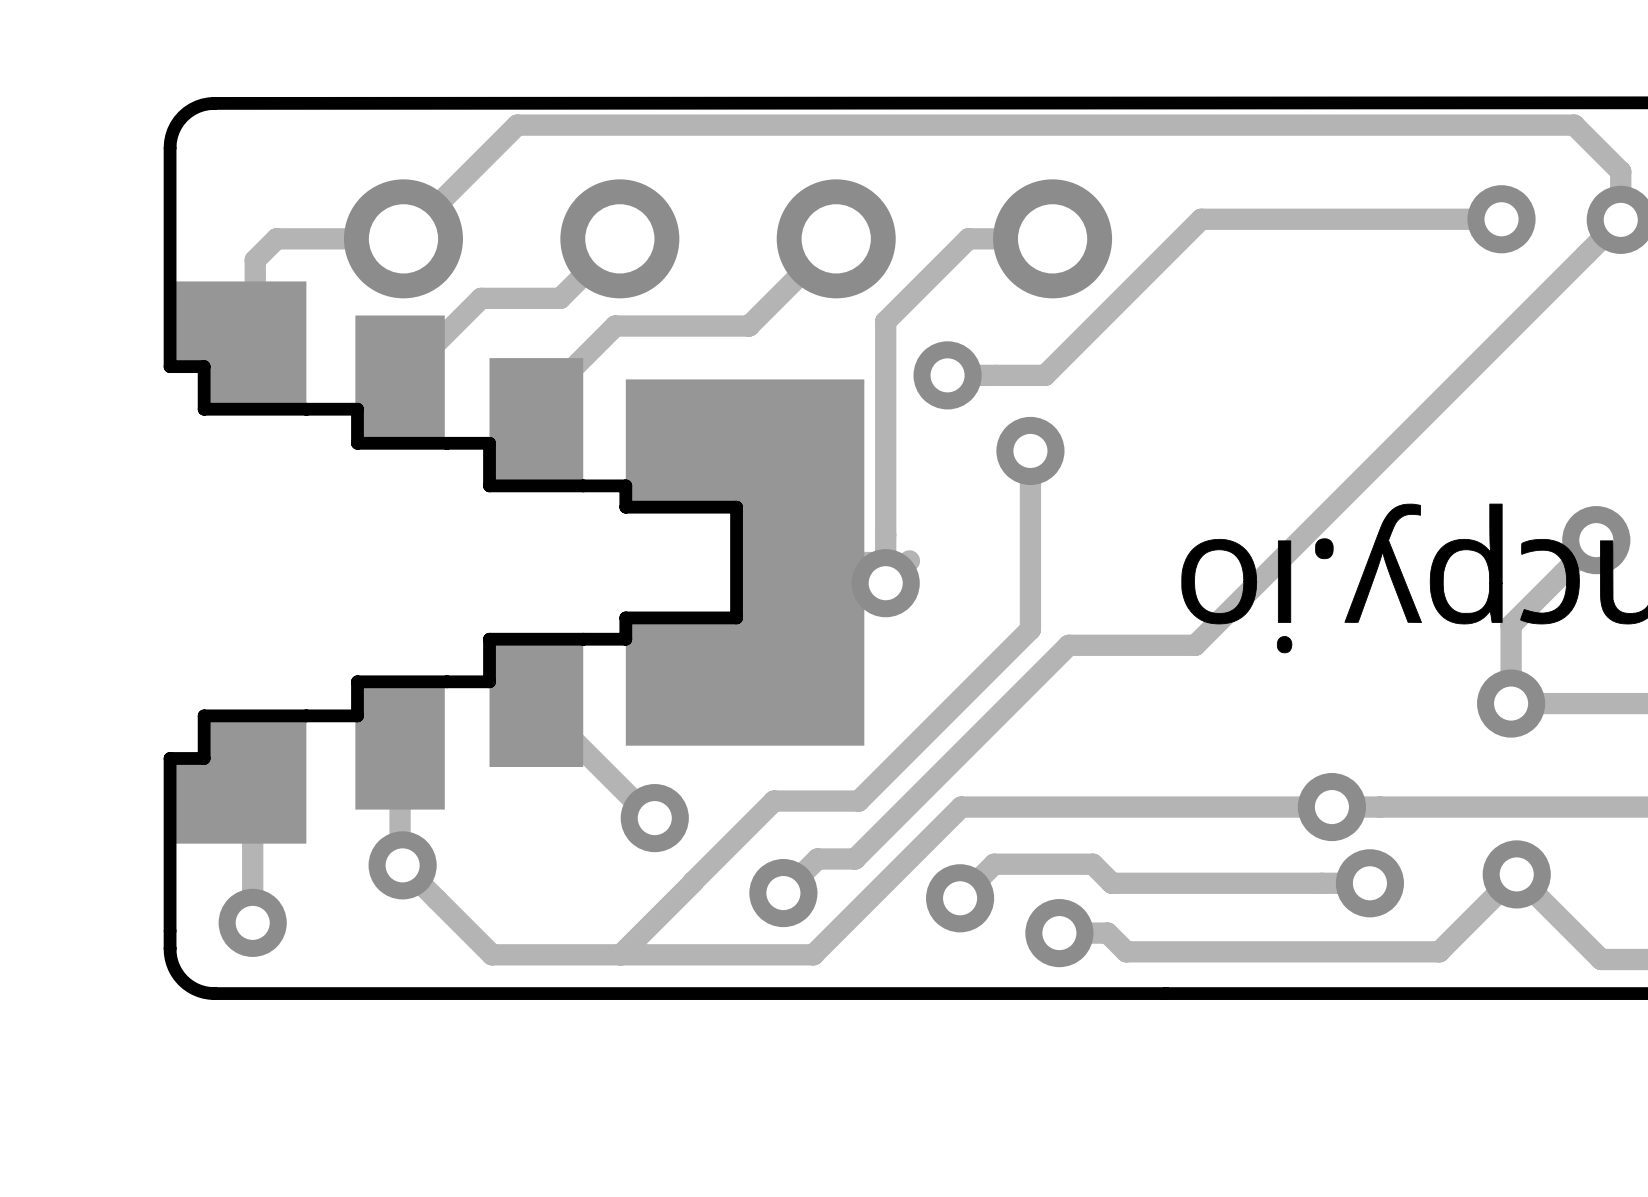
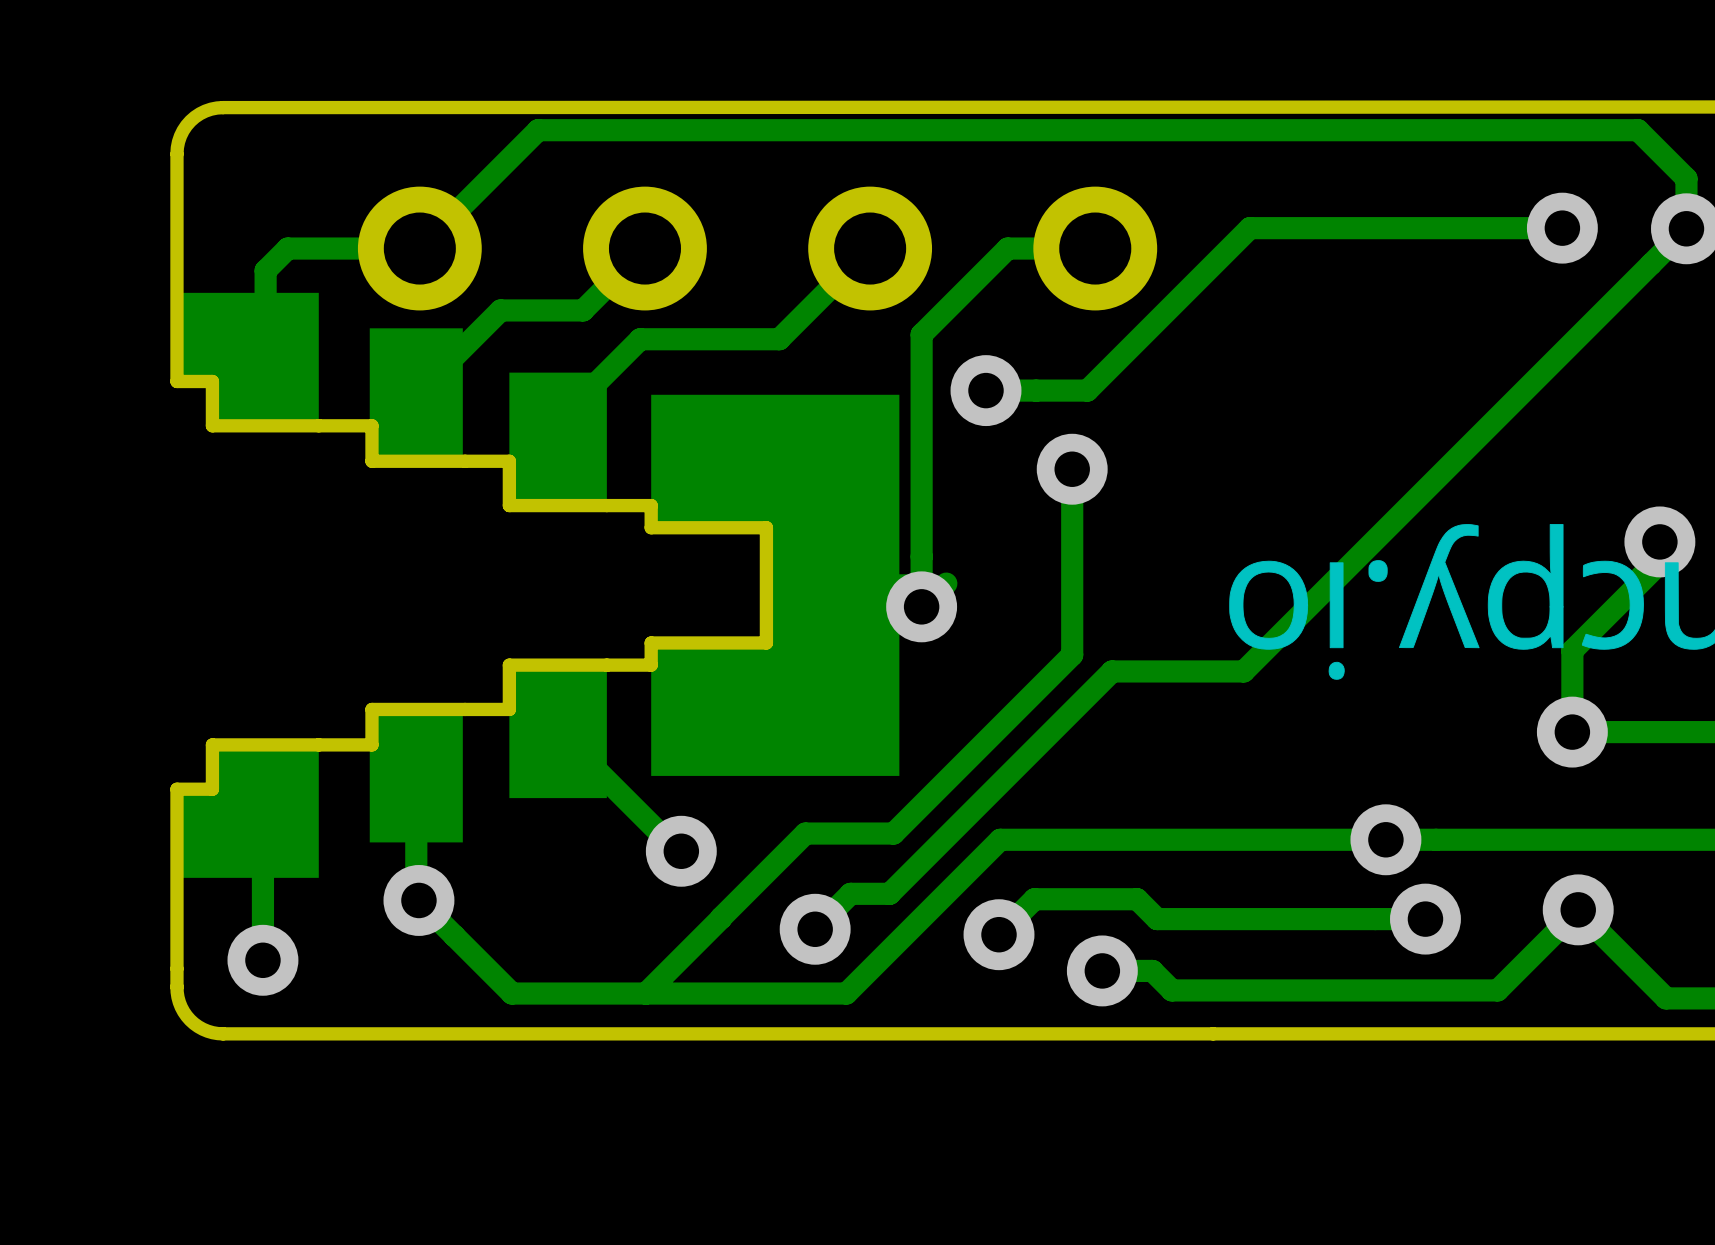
via position: (1596, 540) -> (1659, 541)

